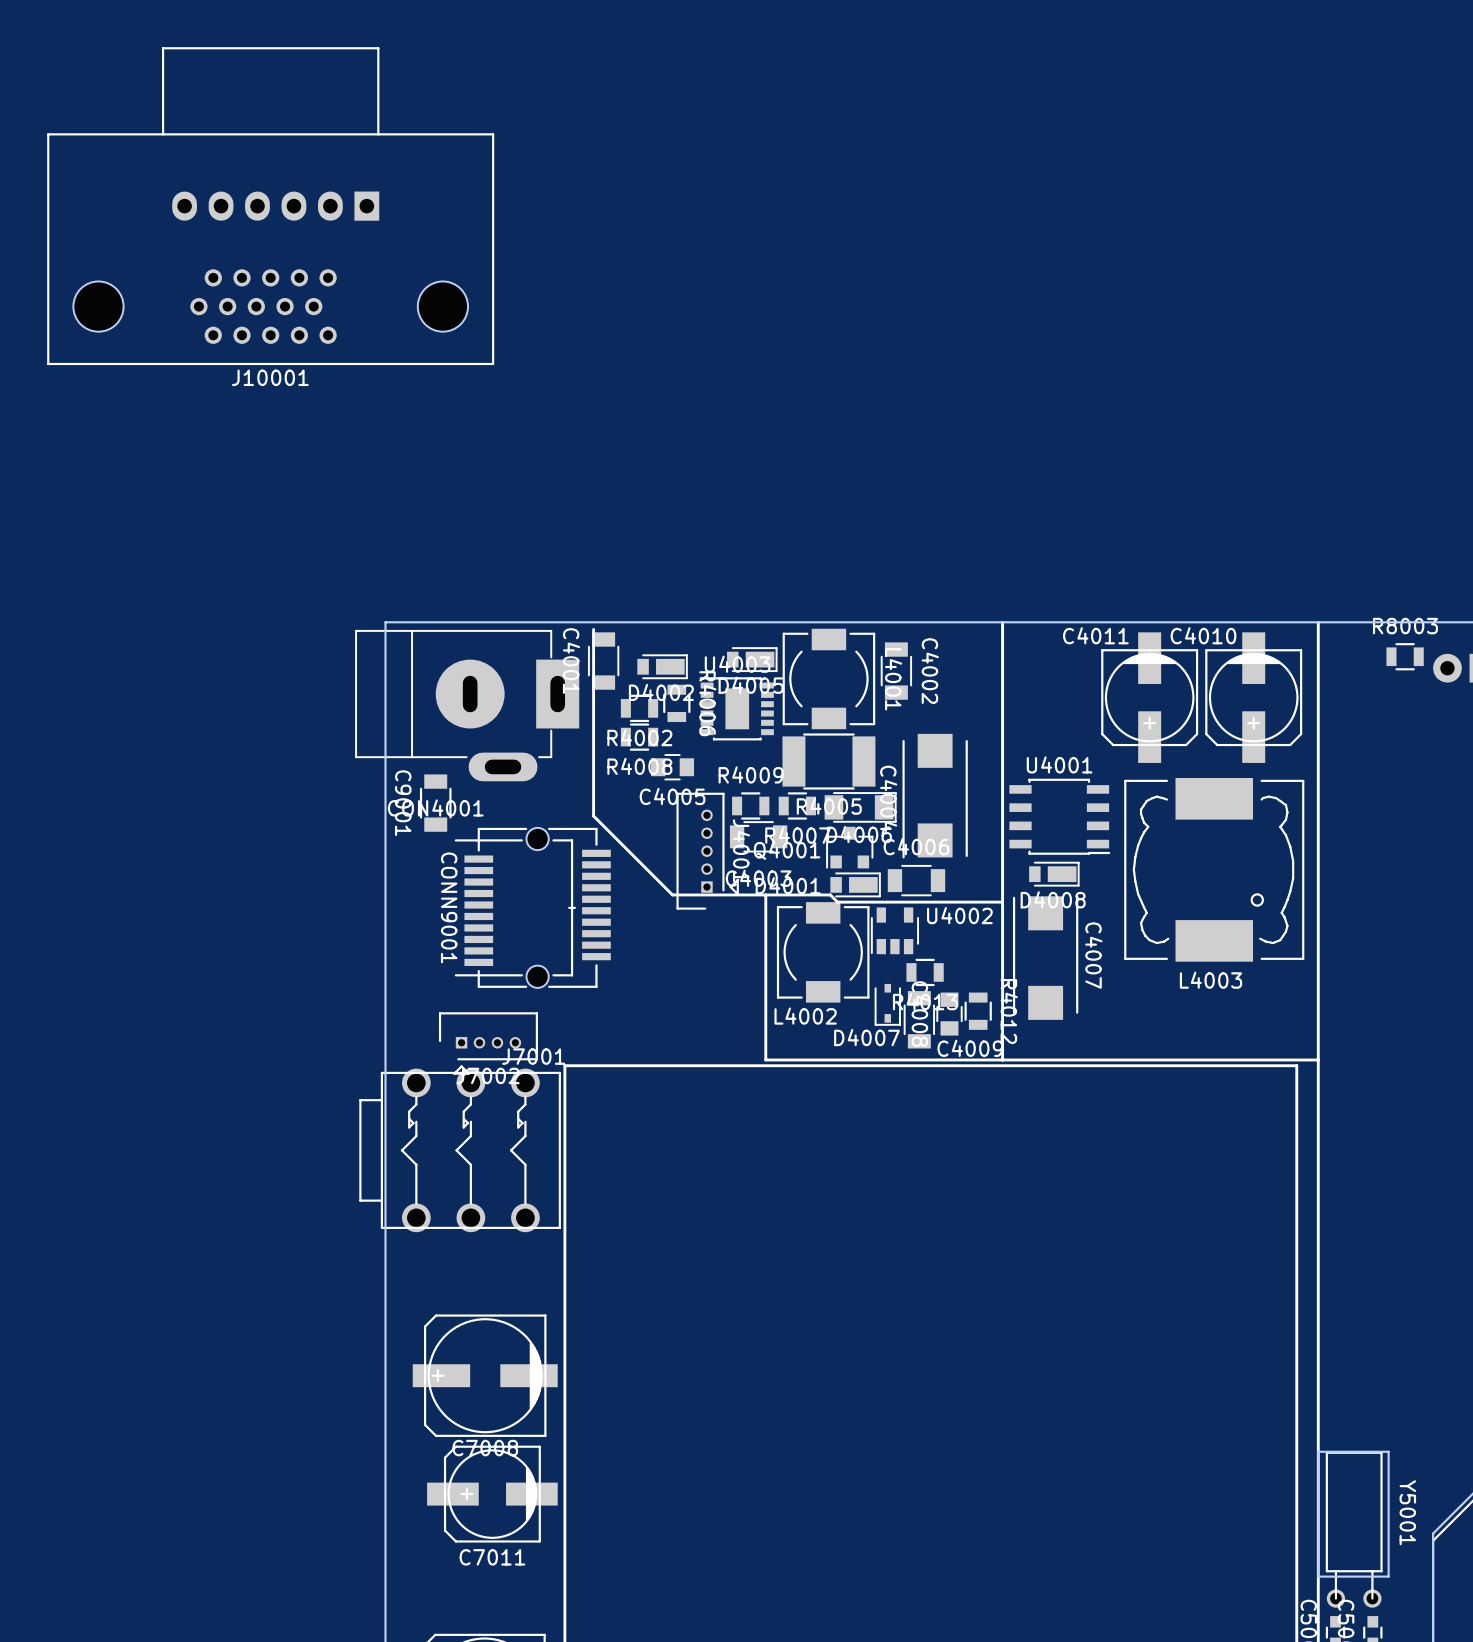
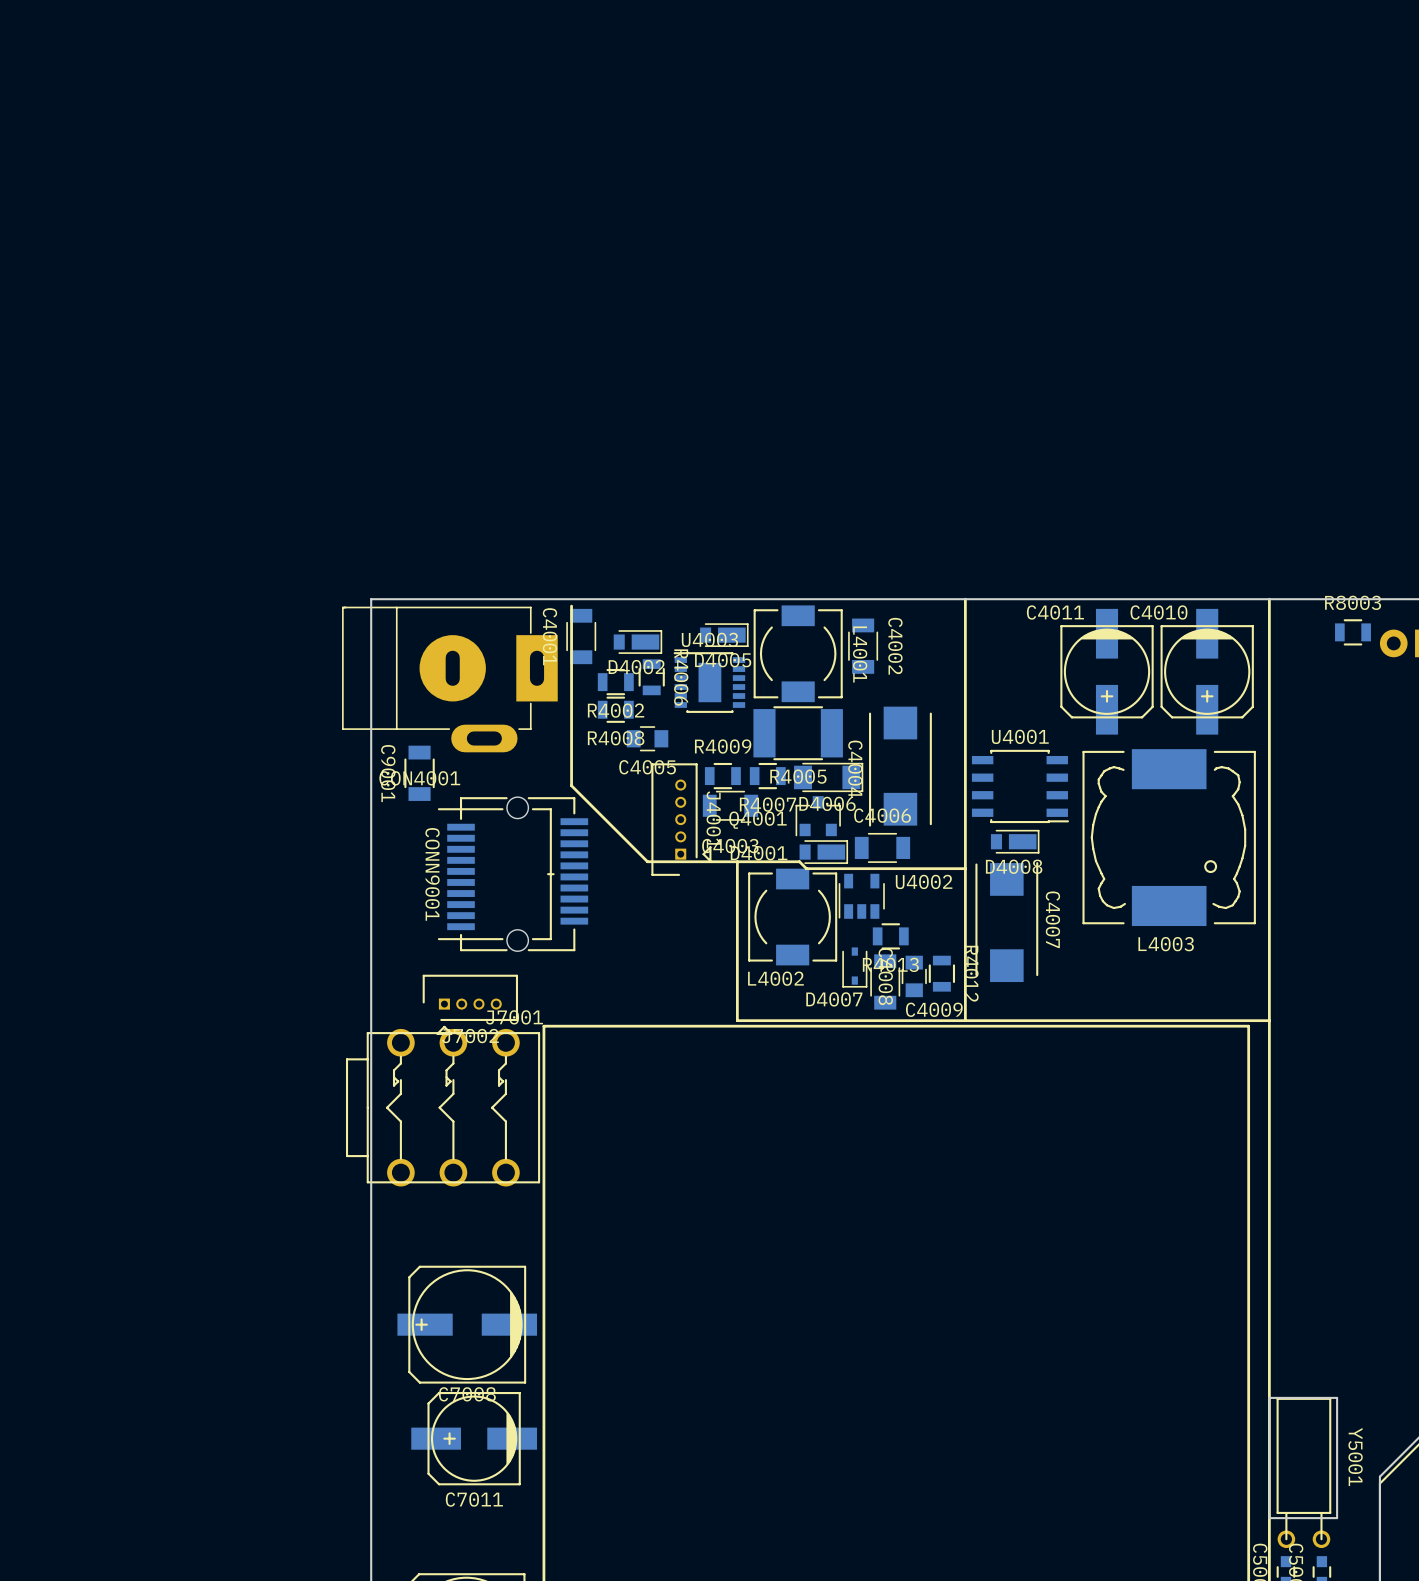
J10001: (270, 206) -> none
part: (275, 206) -> none

